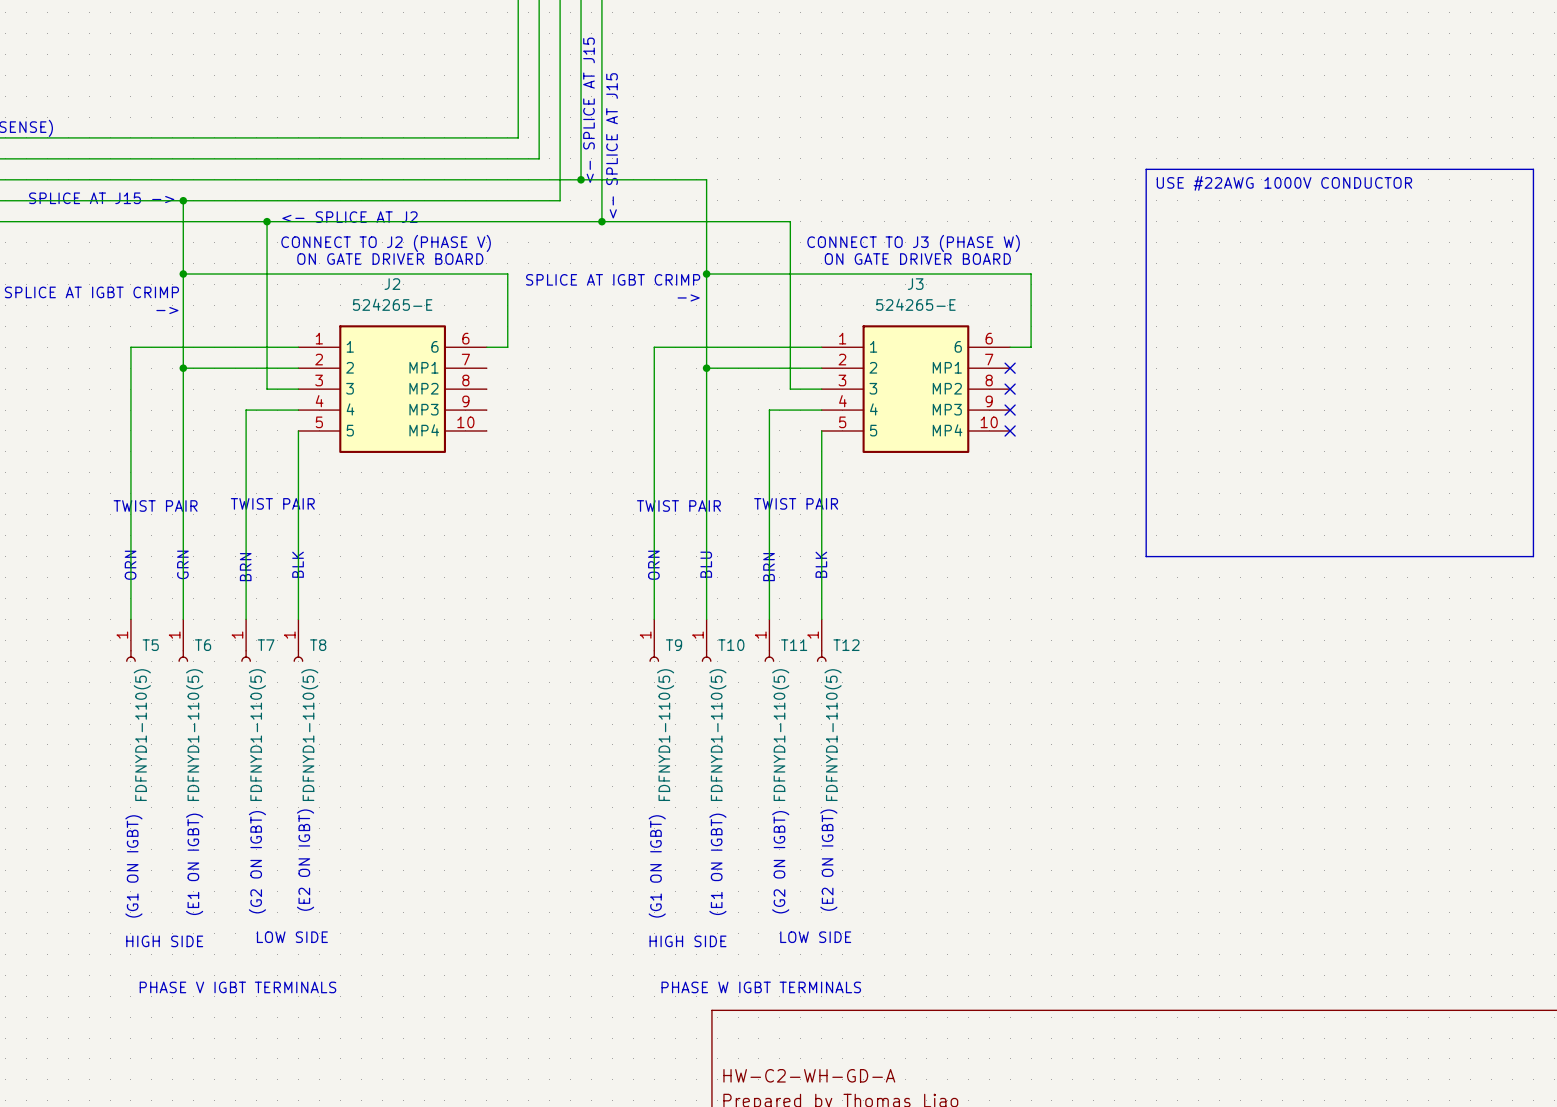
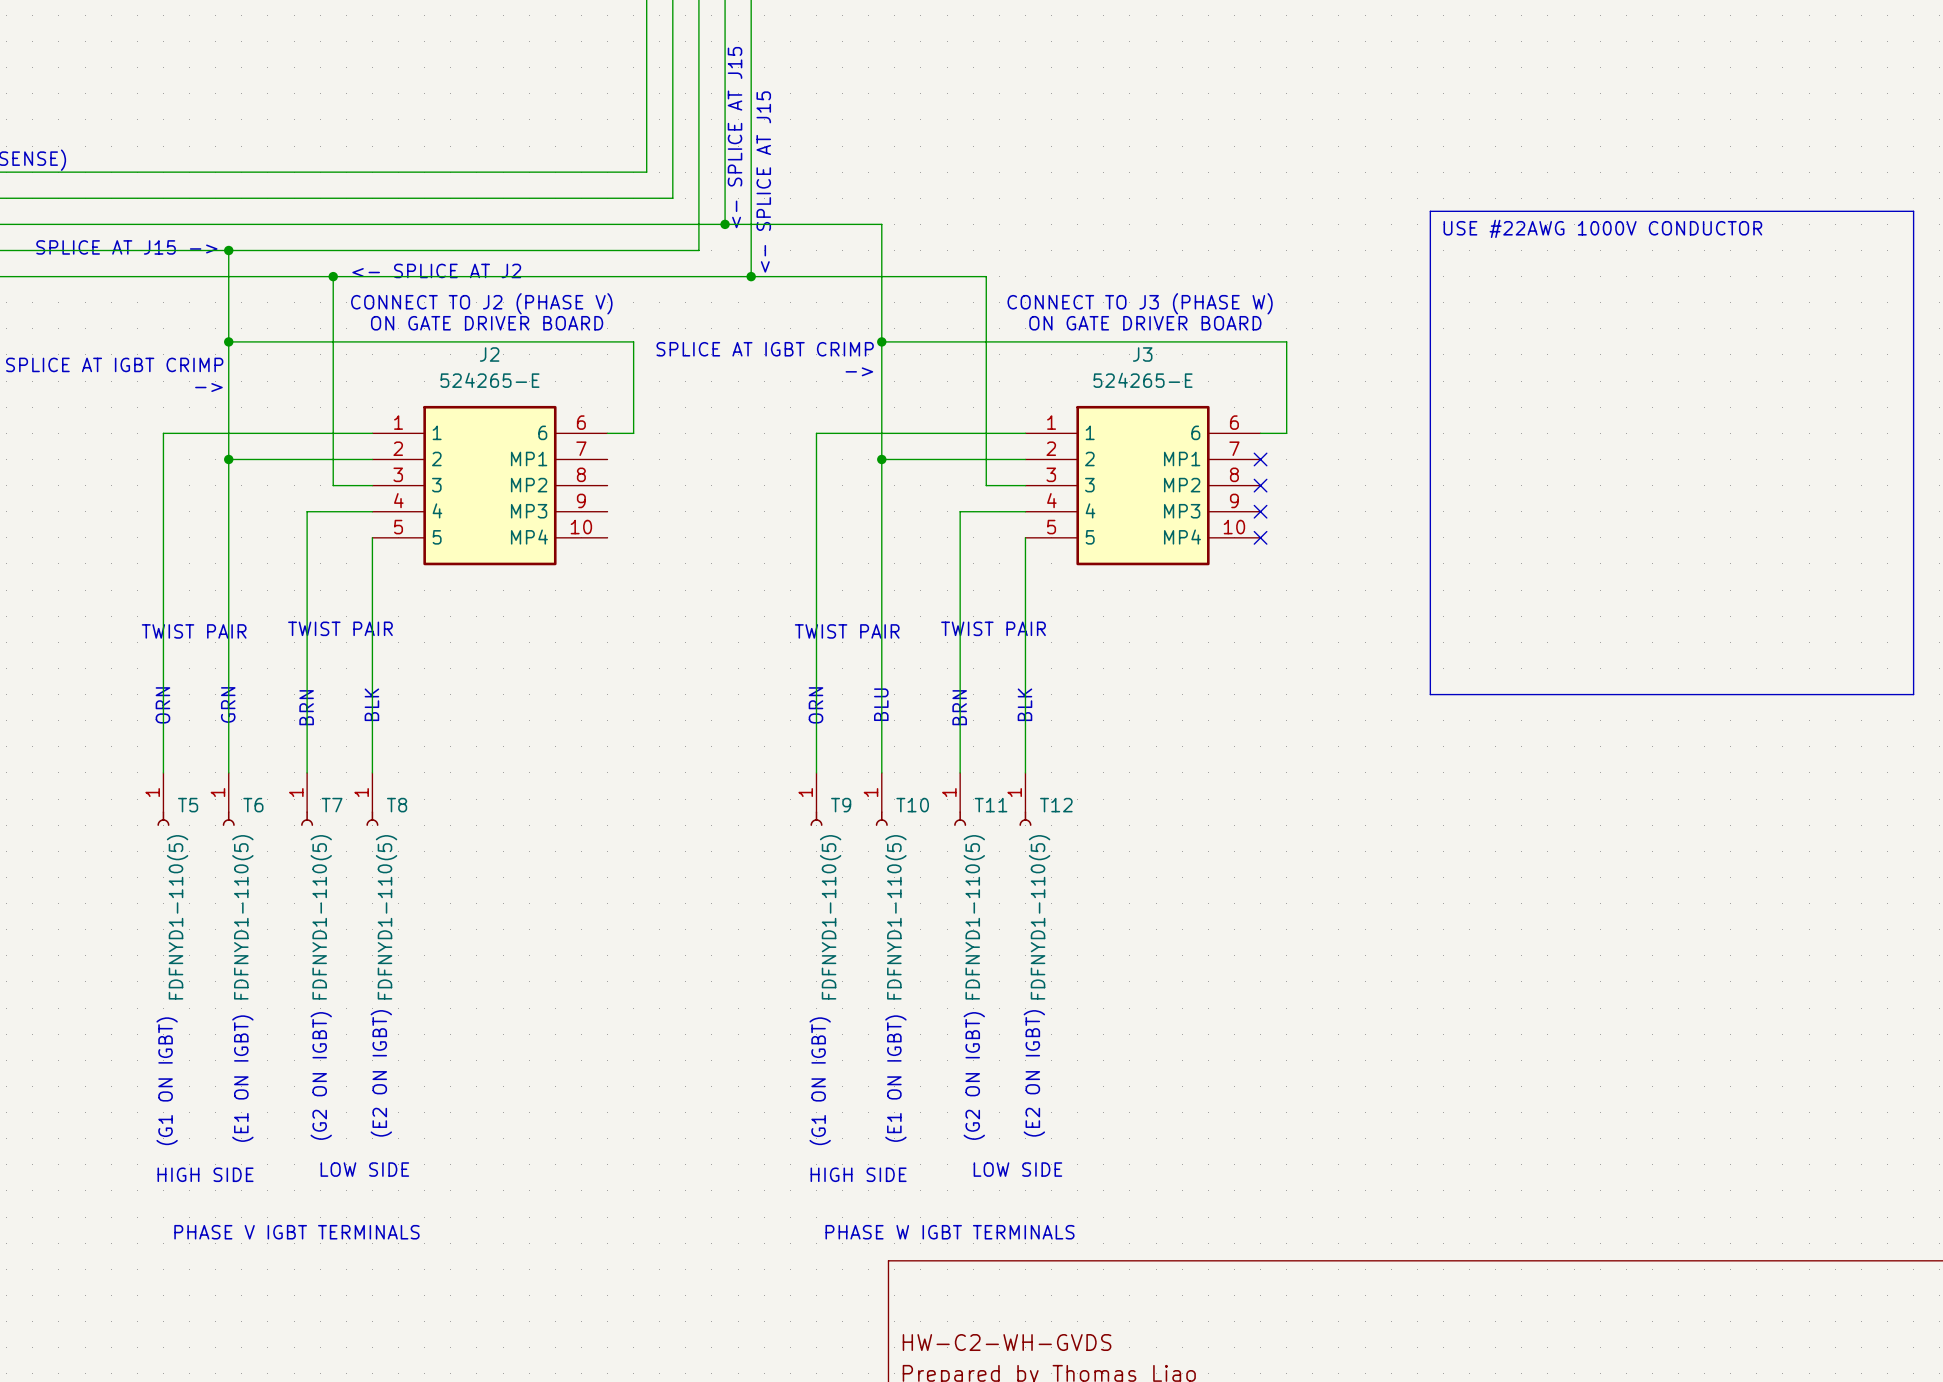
title block: HW-C2-WH-GD-A (809, 1075) -> HW-C2-WH-GVDS (1007, 1342)

